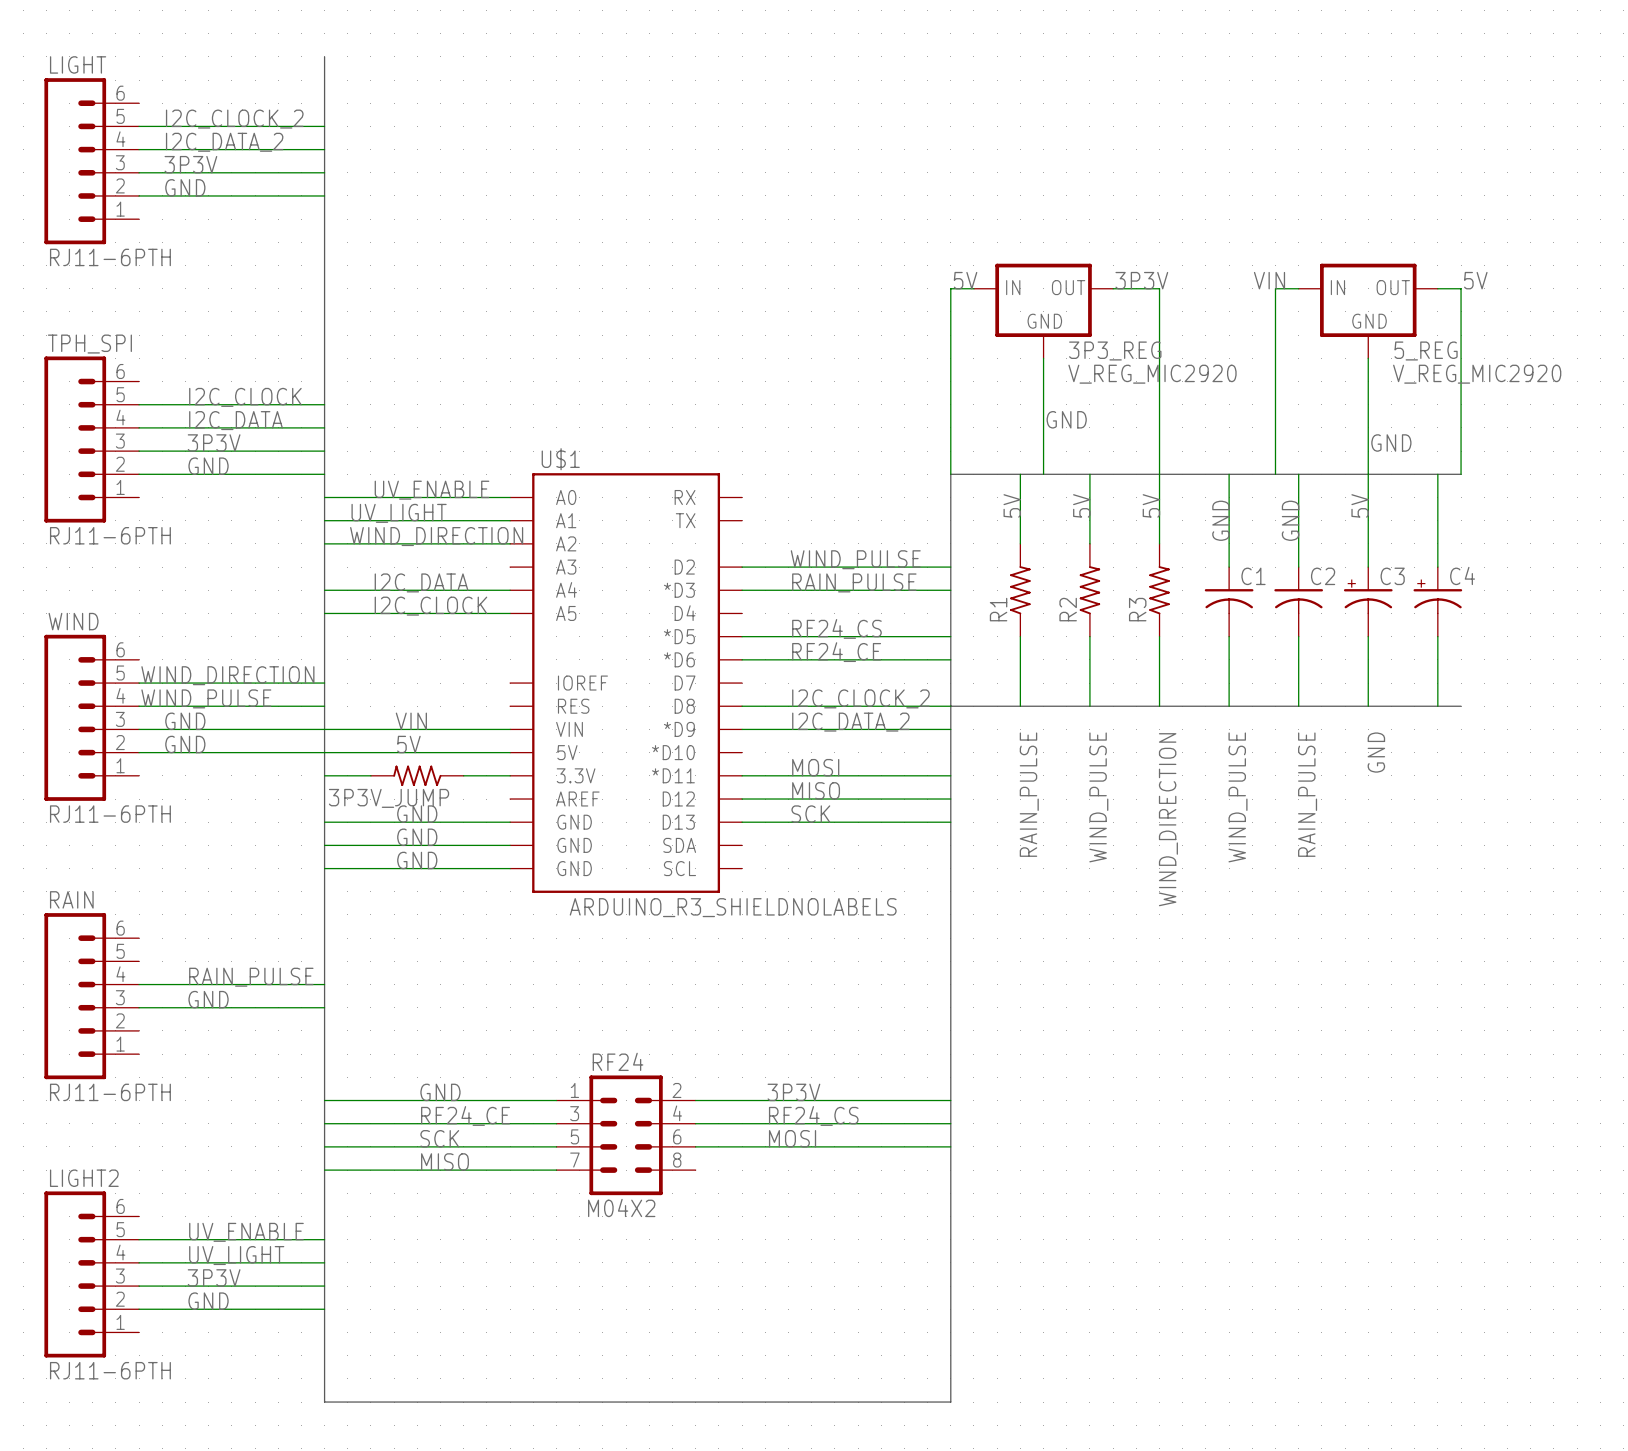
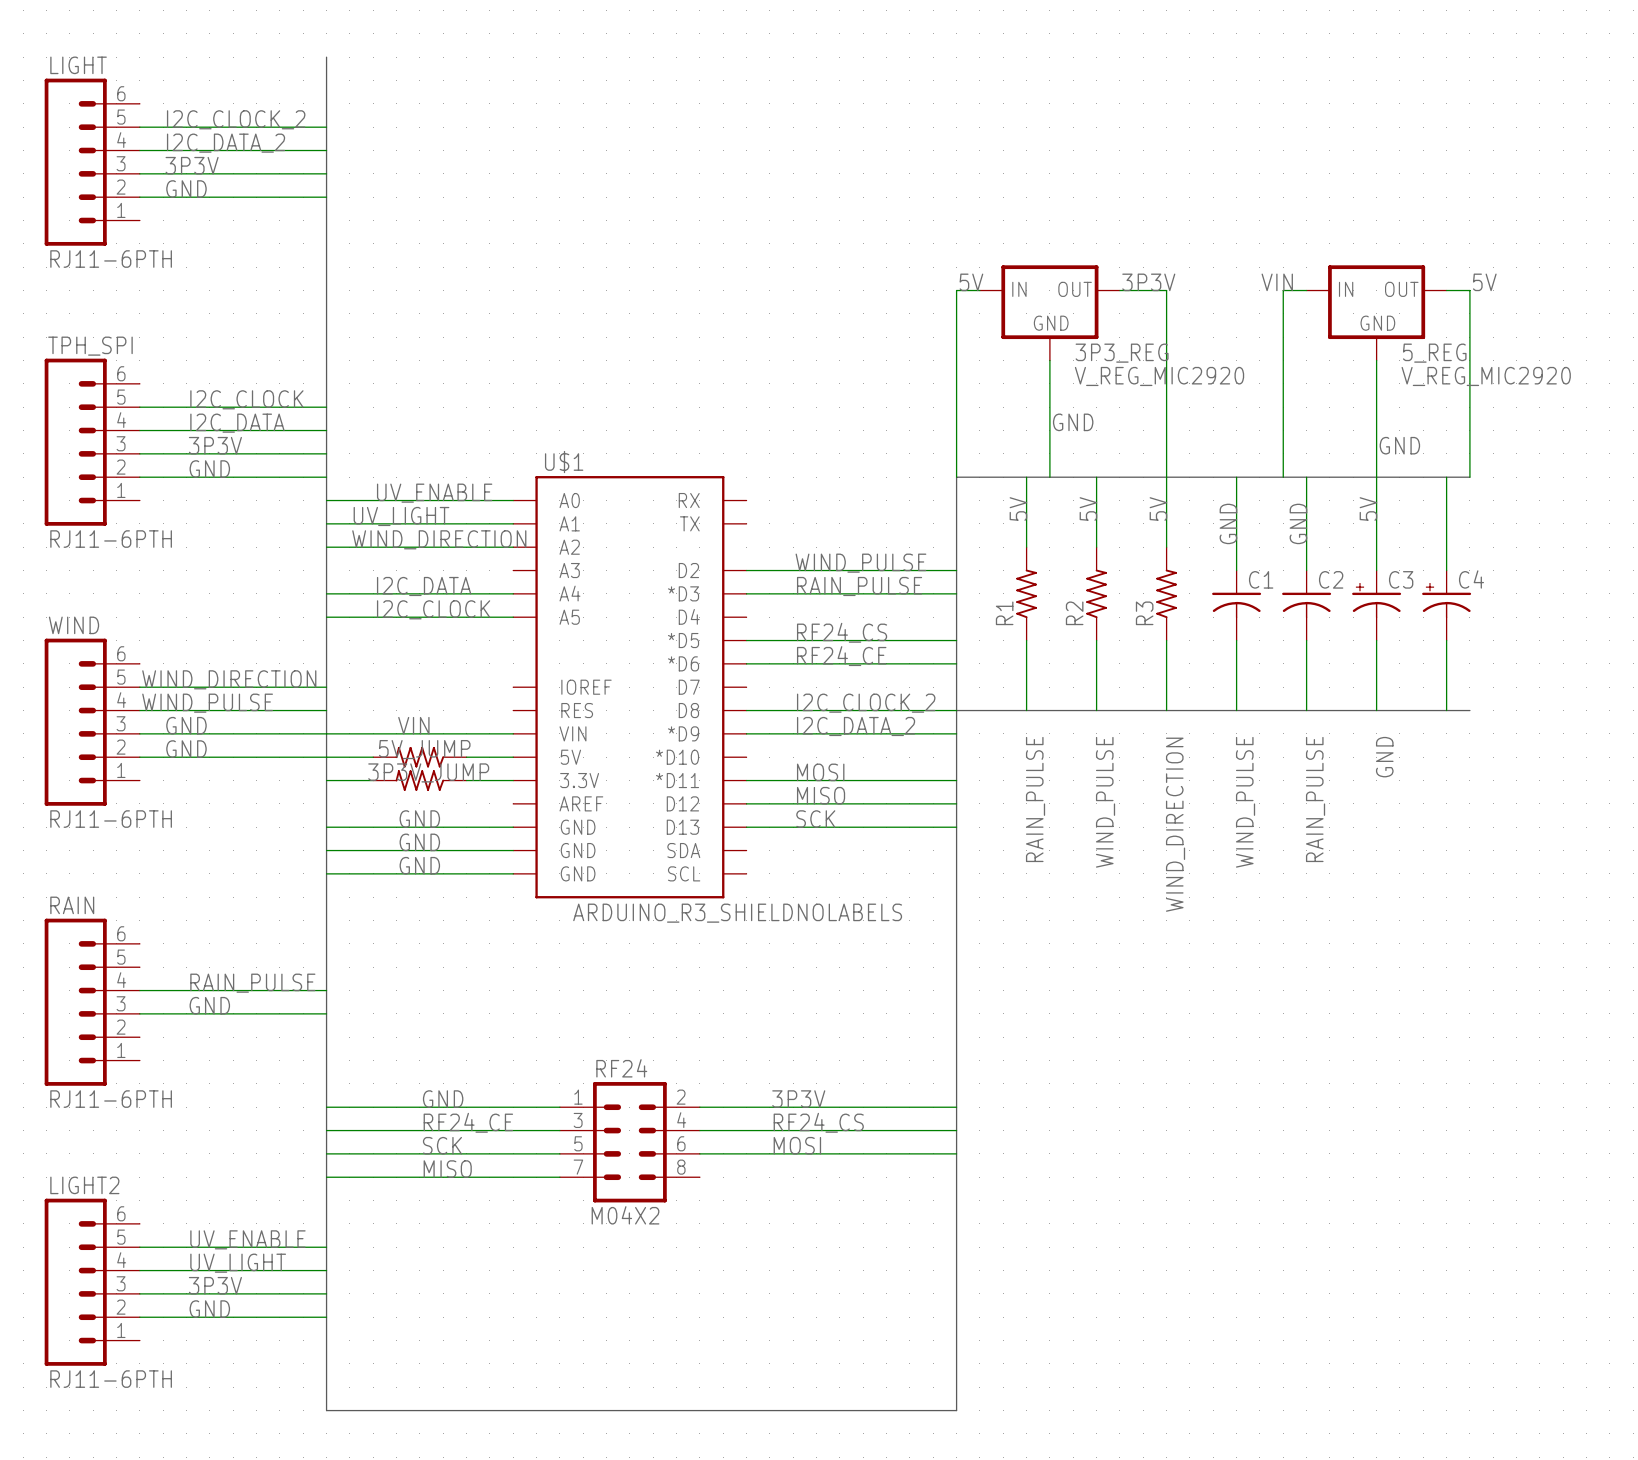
label: 5V (408, 744) -> none
5V_JUMP: none -> (419, 757)
3P3V_JUMP name position: 3P3V_JUMP (389, 798) -> 3P3V_JUMP (428, 772)

